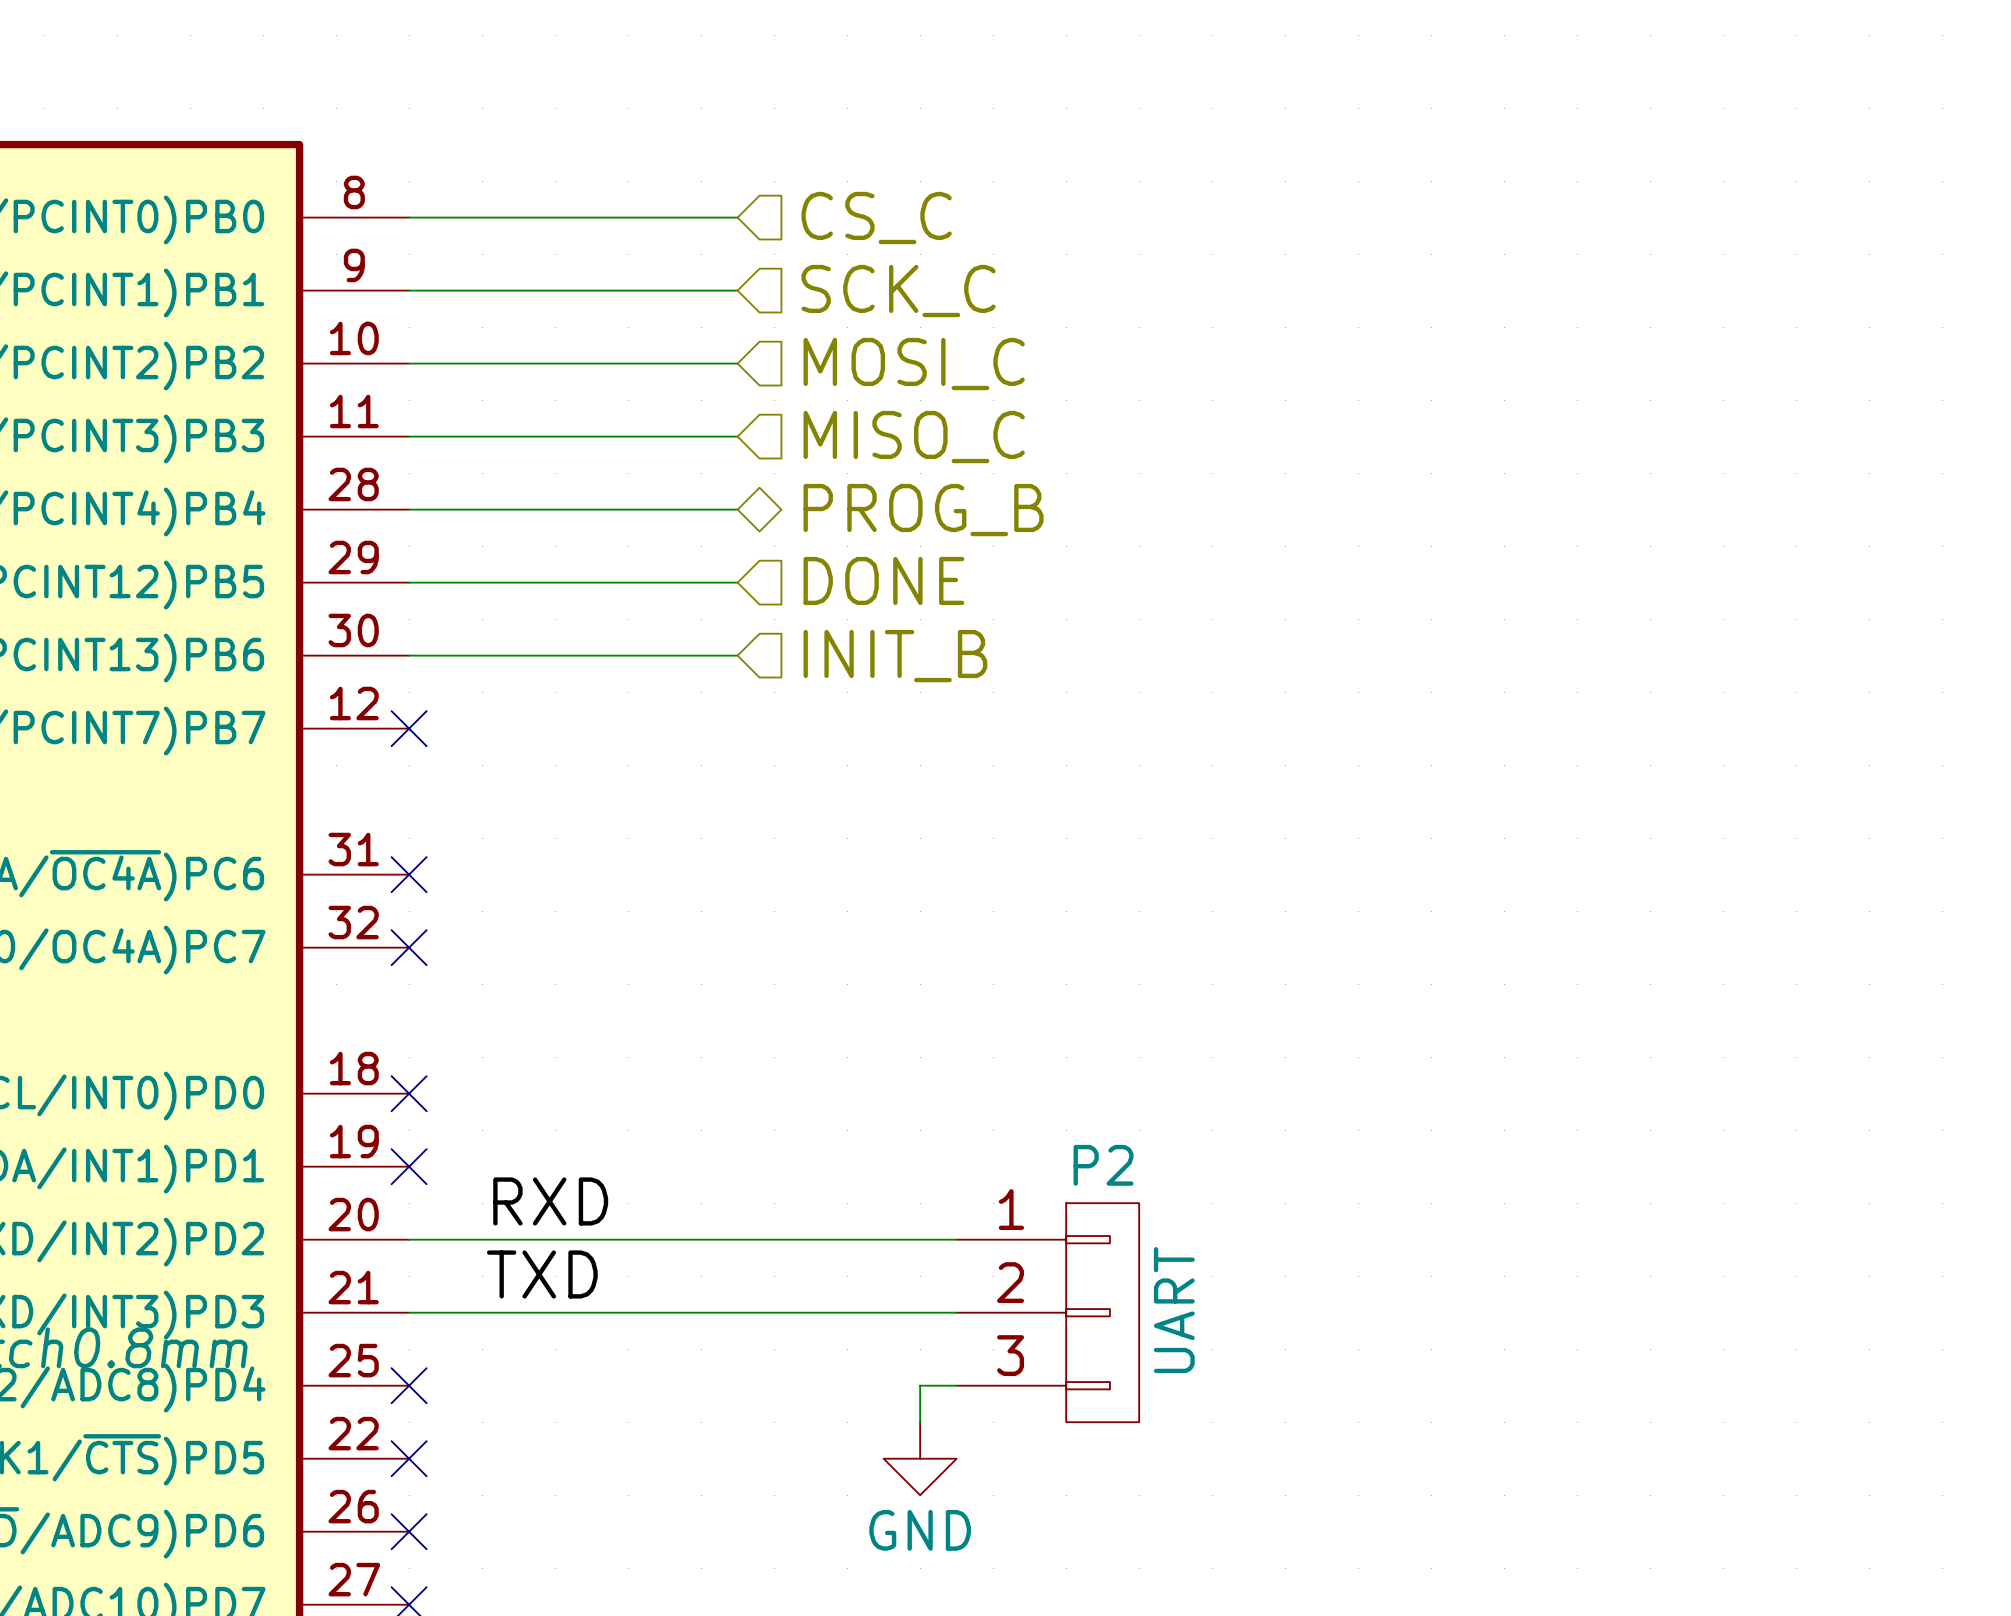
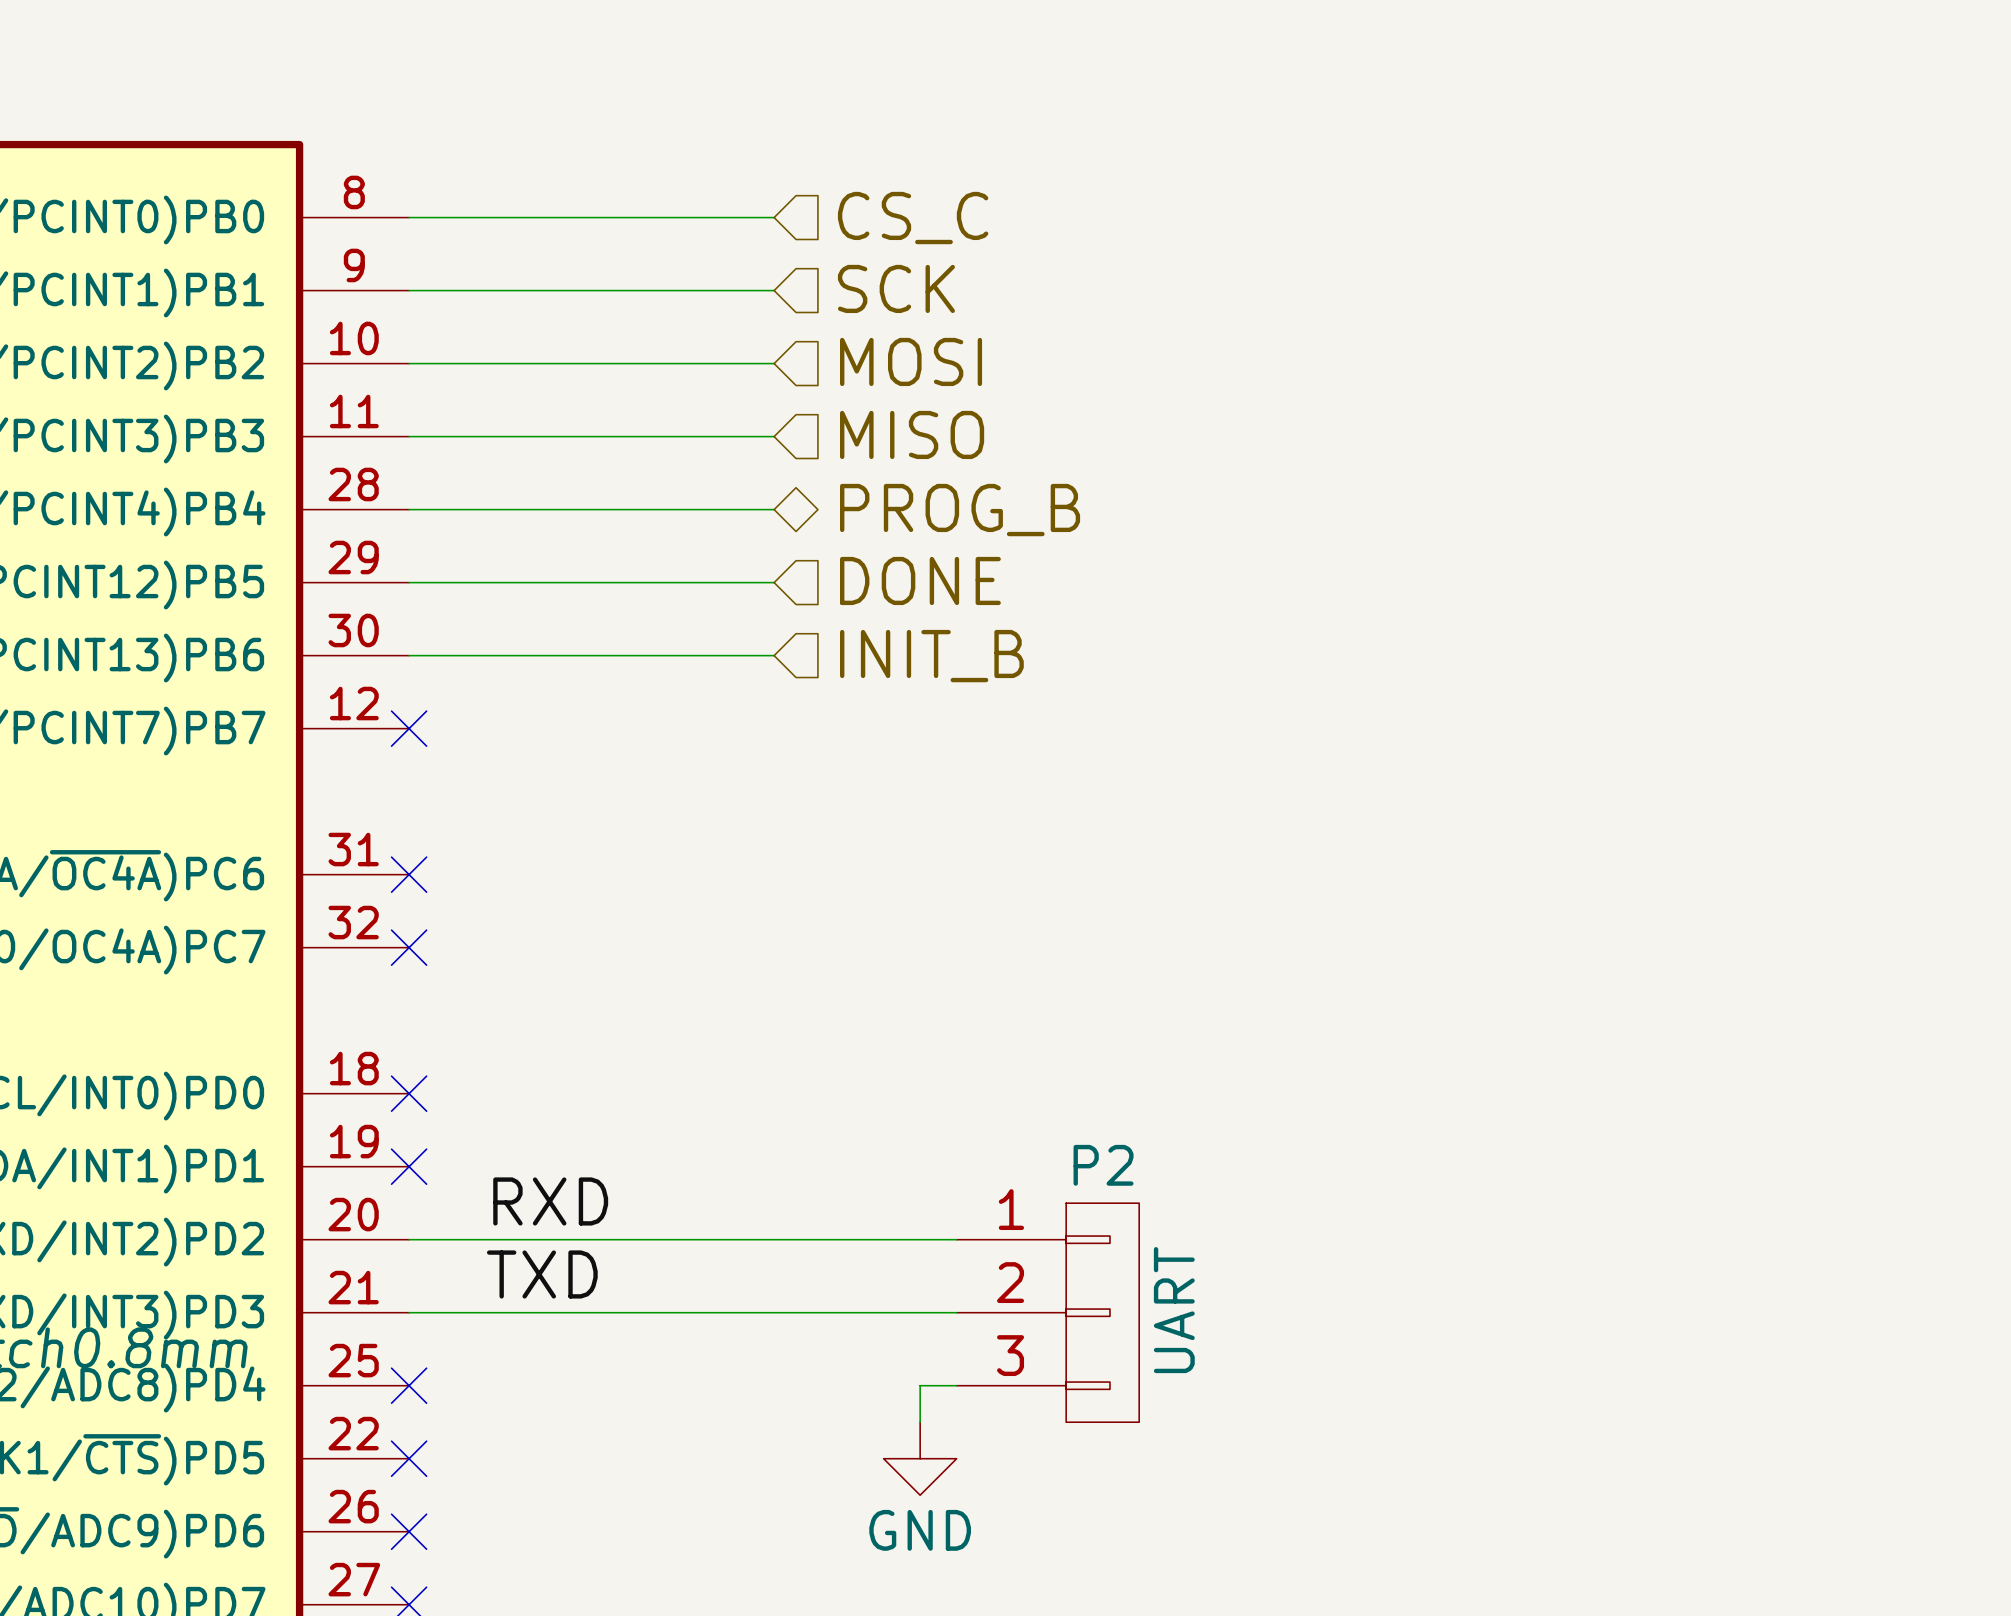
wire: none -> (737, 217) (774, 217)
hierarchical label position: CS_C (876, 218) -> CS_C (913, 218)
wire: none -> (737, 290) (774, 290)
hierarchical label: SCK_C (898, 291) -> SCK (896, 288)
wire: none -> (737, 363) (774, 363)
hierarchical label: MOSI_C (914, 364) -> MOSI (911, 361)
wire: none -> (737, 436) (774, 436)
hierarchical label: MISO_C (914, 437) -> MISO (912, 434)
wire: none -> (737, 509) (774, 509)
hierarchical label position: PROG_B (923, 510) -> PROG_B (960, 510)
hierarchical label position: DONE (883, 580) -> DONE (920, 580)
wire: none -> (737, 582) (774, 582)
wire: none -> (737, 655) (774, 655)
hierarchical label position: INIT_B (895, 656) -> INIT_B (931, 656)

